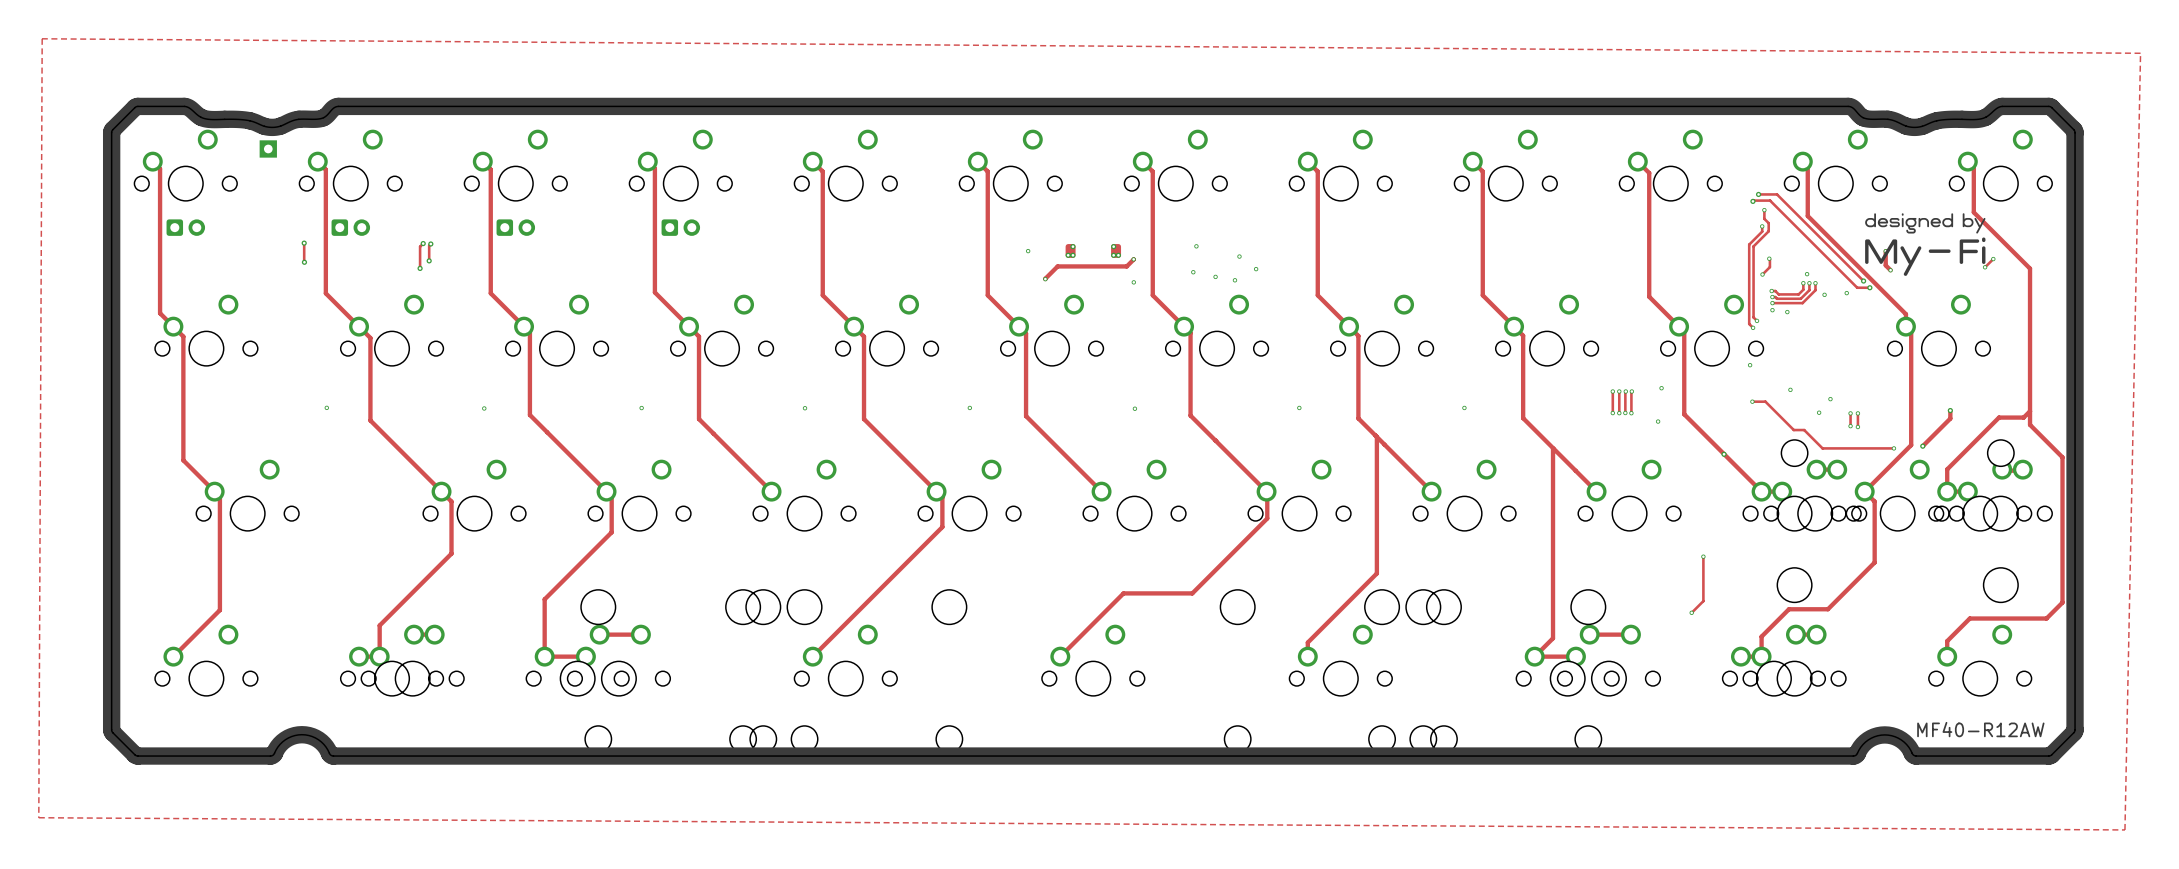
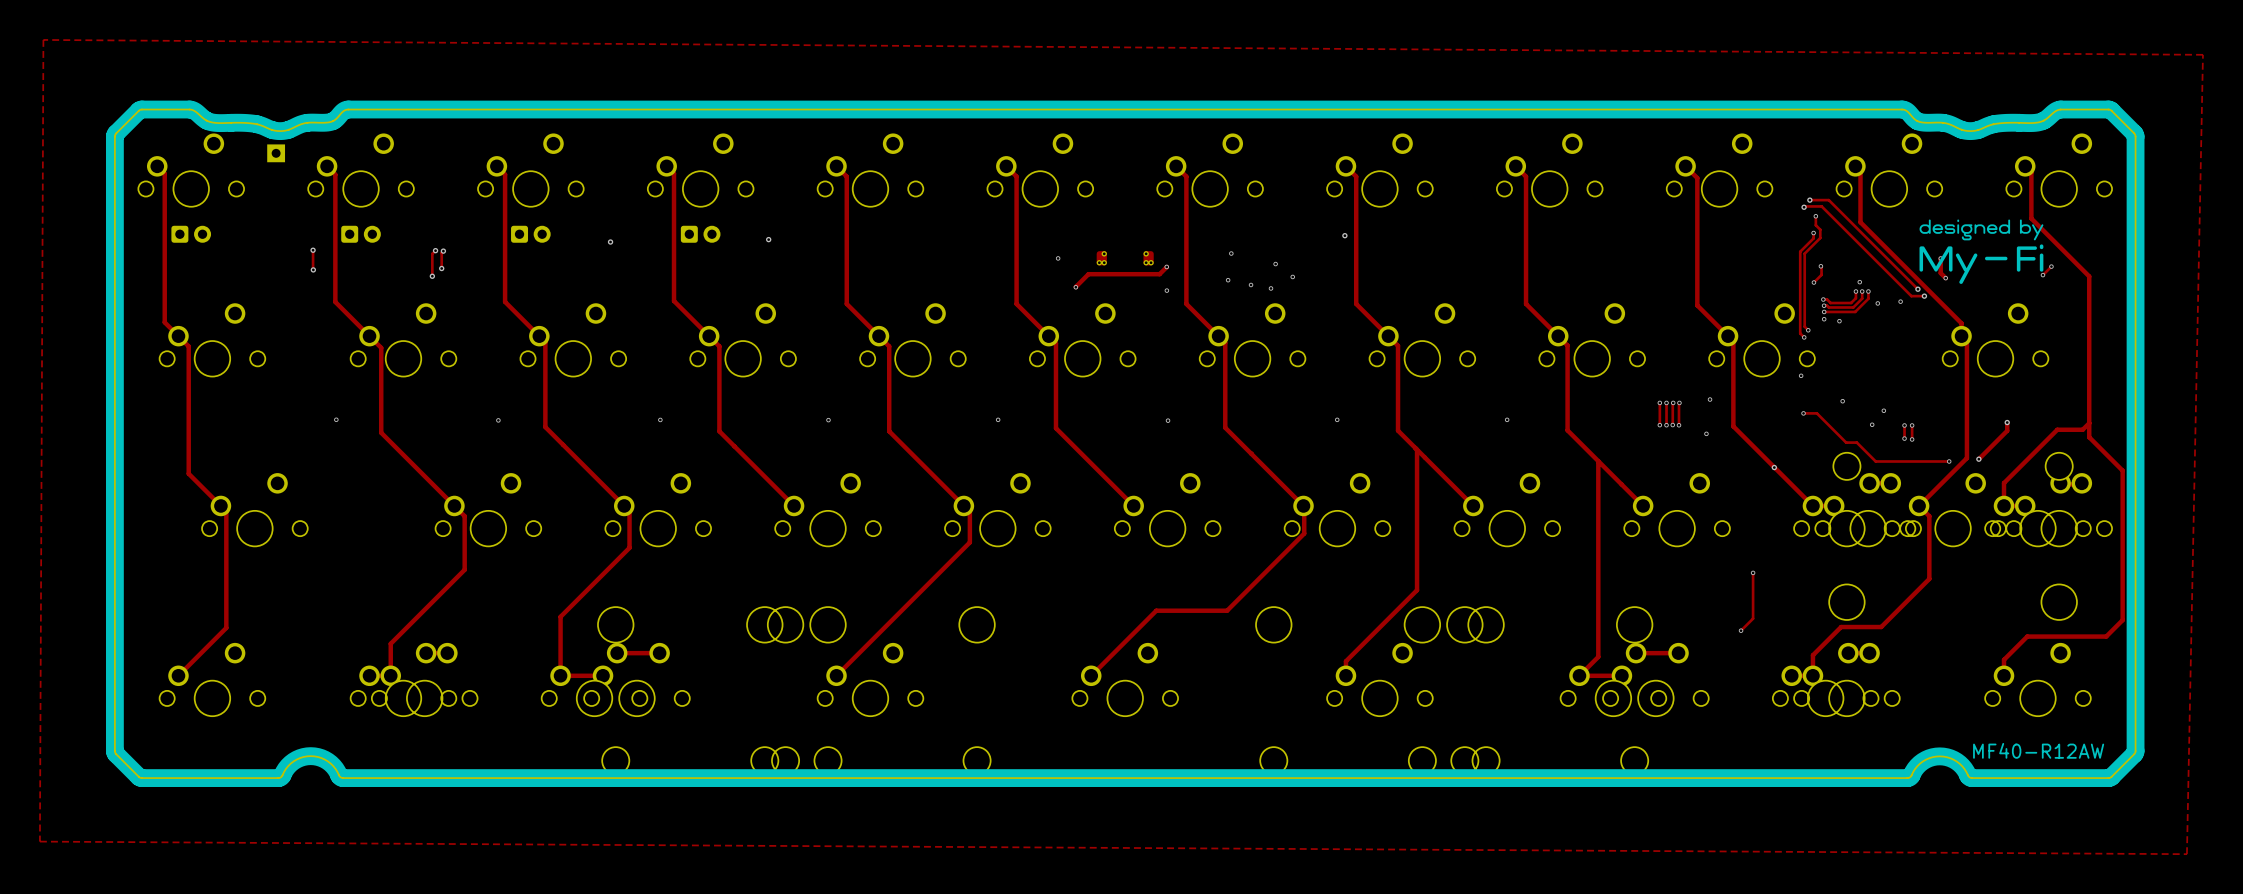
via: none -> (1344, 235)
via: none -> (768, 239)
via: none -> (610, 242)

